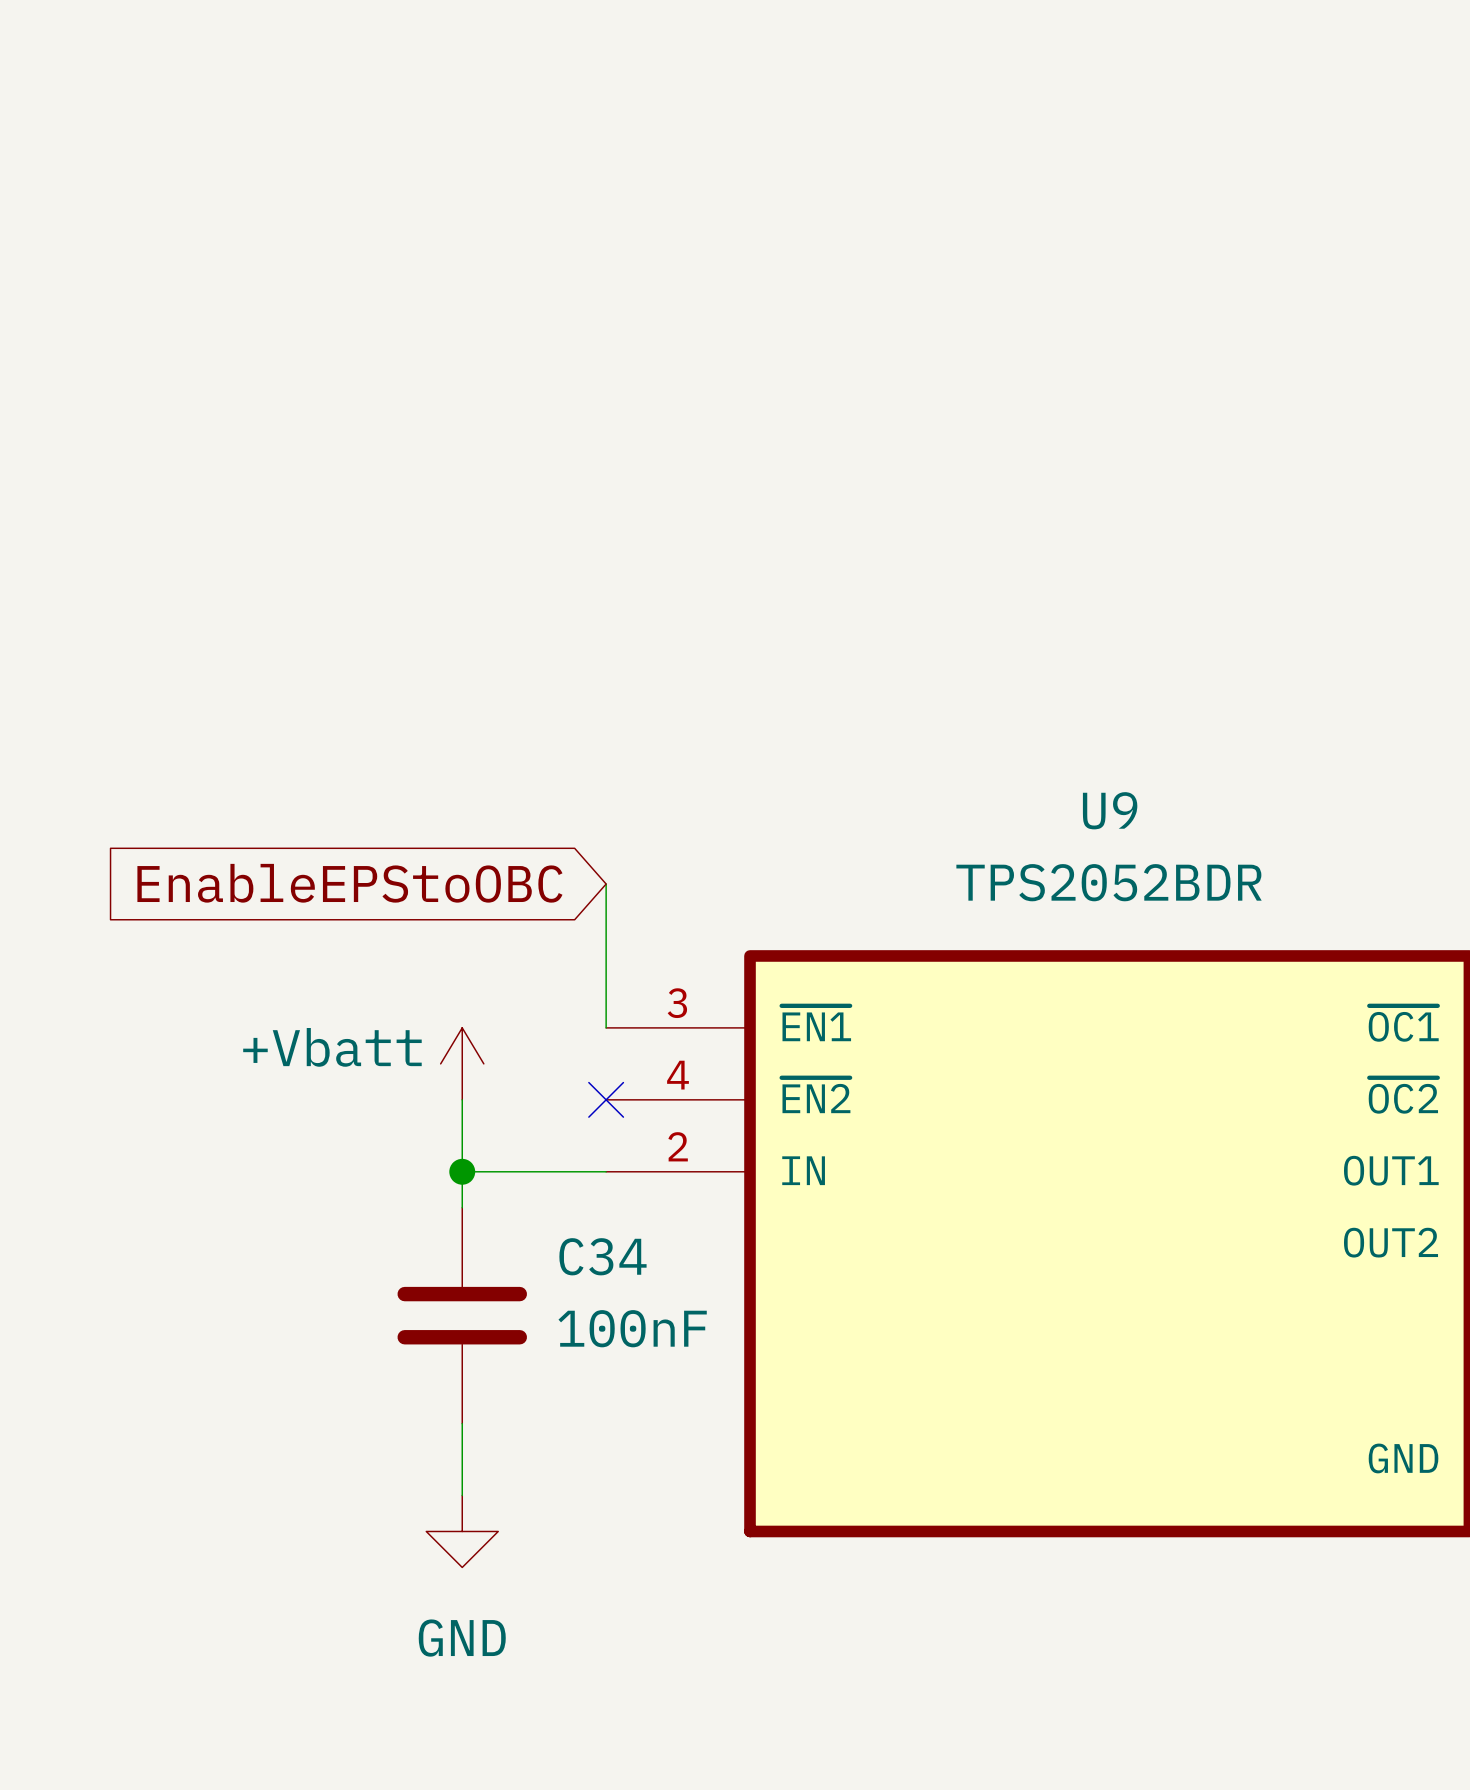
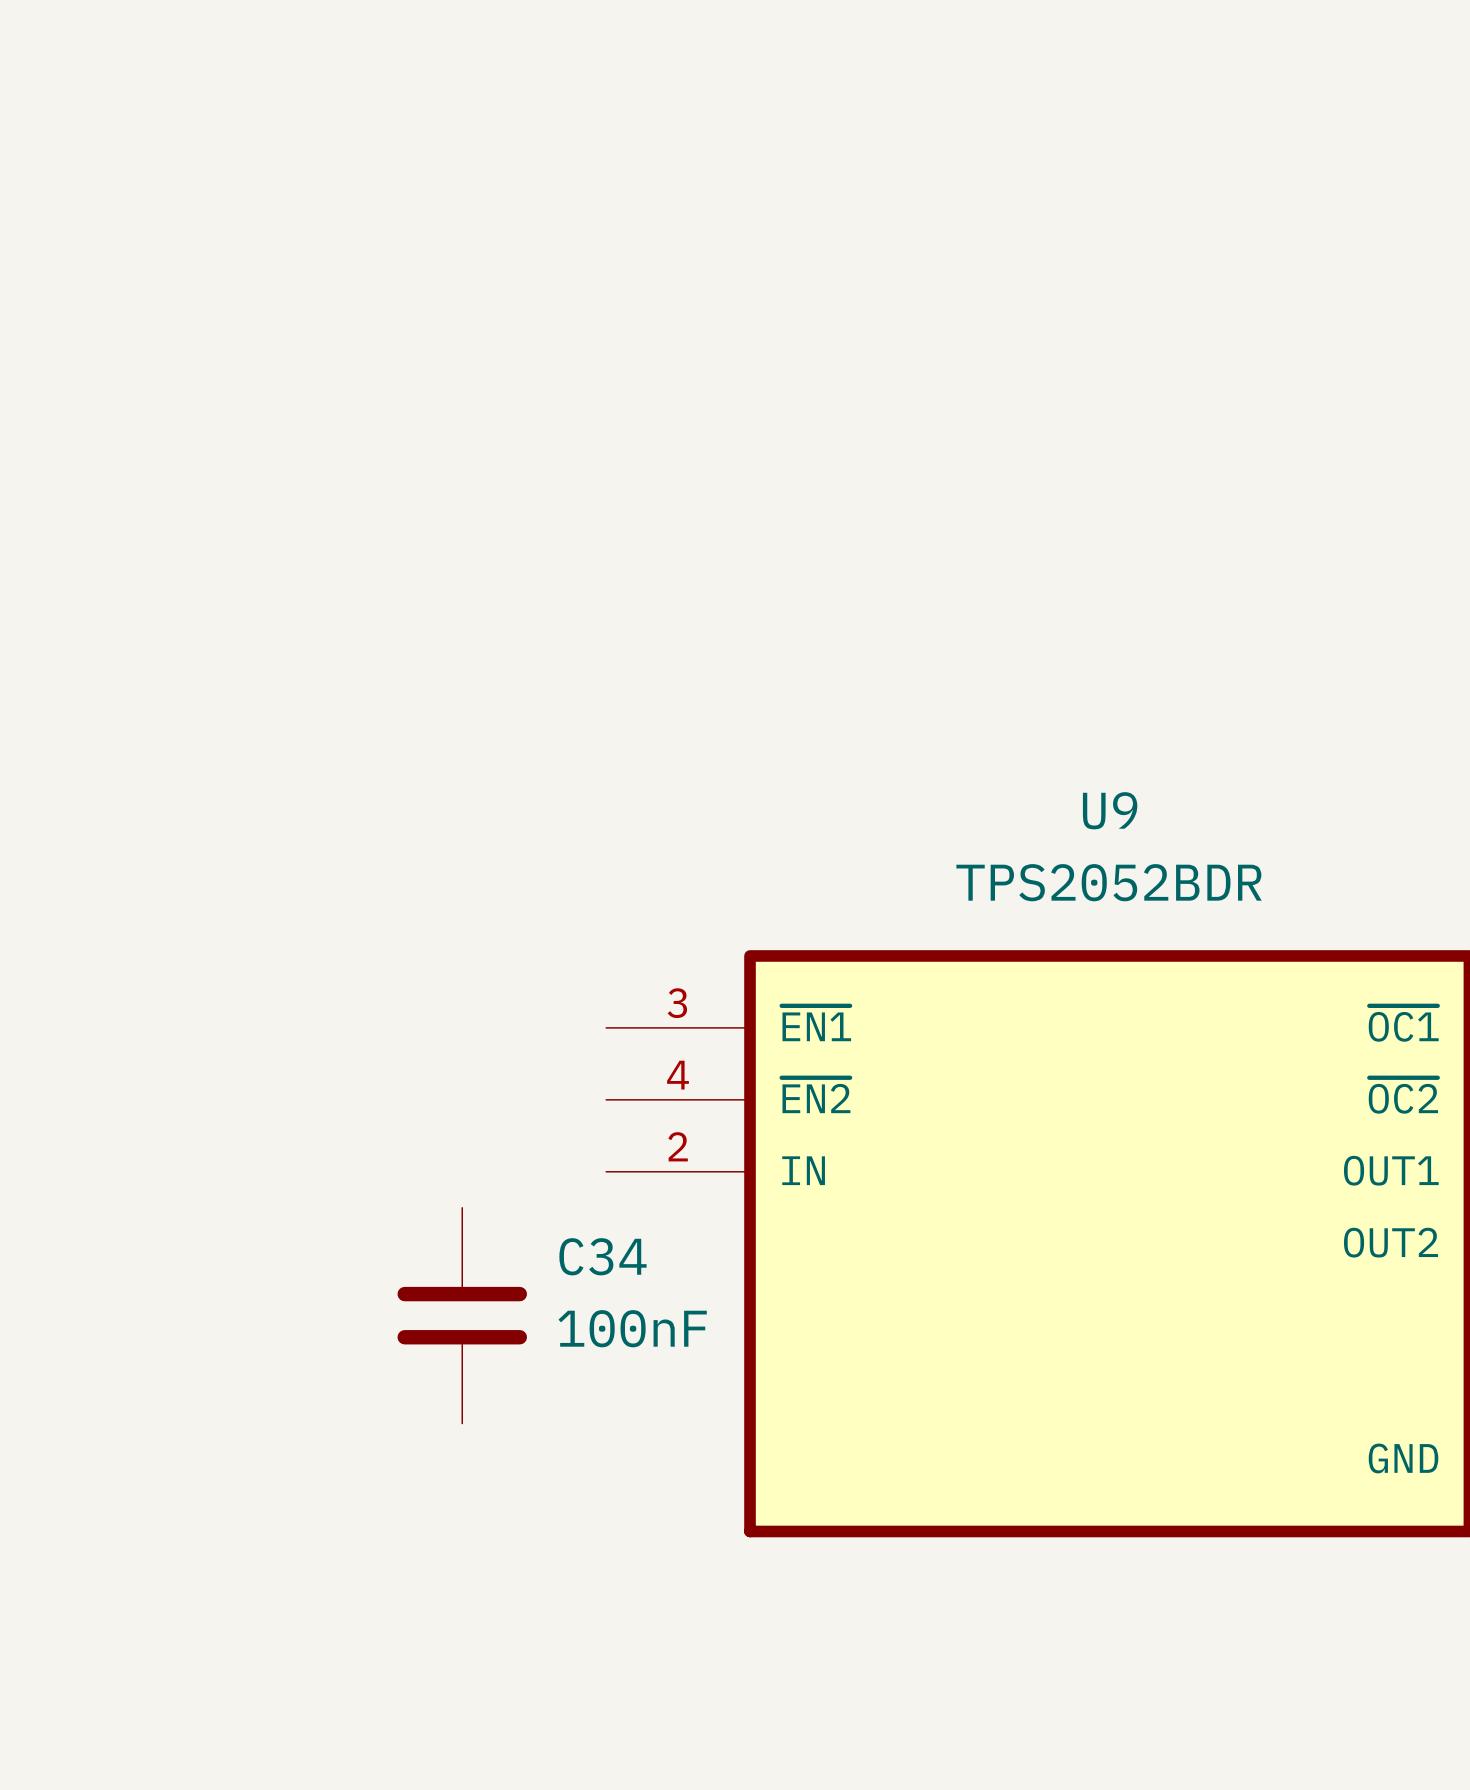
global label: EnableEPStoOBC (349, 883) -> none
wire: (606, 884) (606, 1027) -> none
power symbol: +Vbatt (462, 1063) -> none
wire: (462, 1099) (462, 1207) -> none
no-connect mark: (606, 1099) -> none
wire: (462, 1171) (606, 1171) -> none
junction: (462, 1171) -> none
wire: (462, 1423) (462, 1495) -> none
power symbol: GND (462, 1531) -> none

